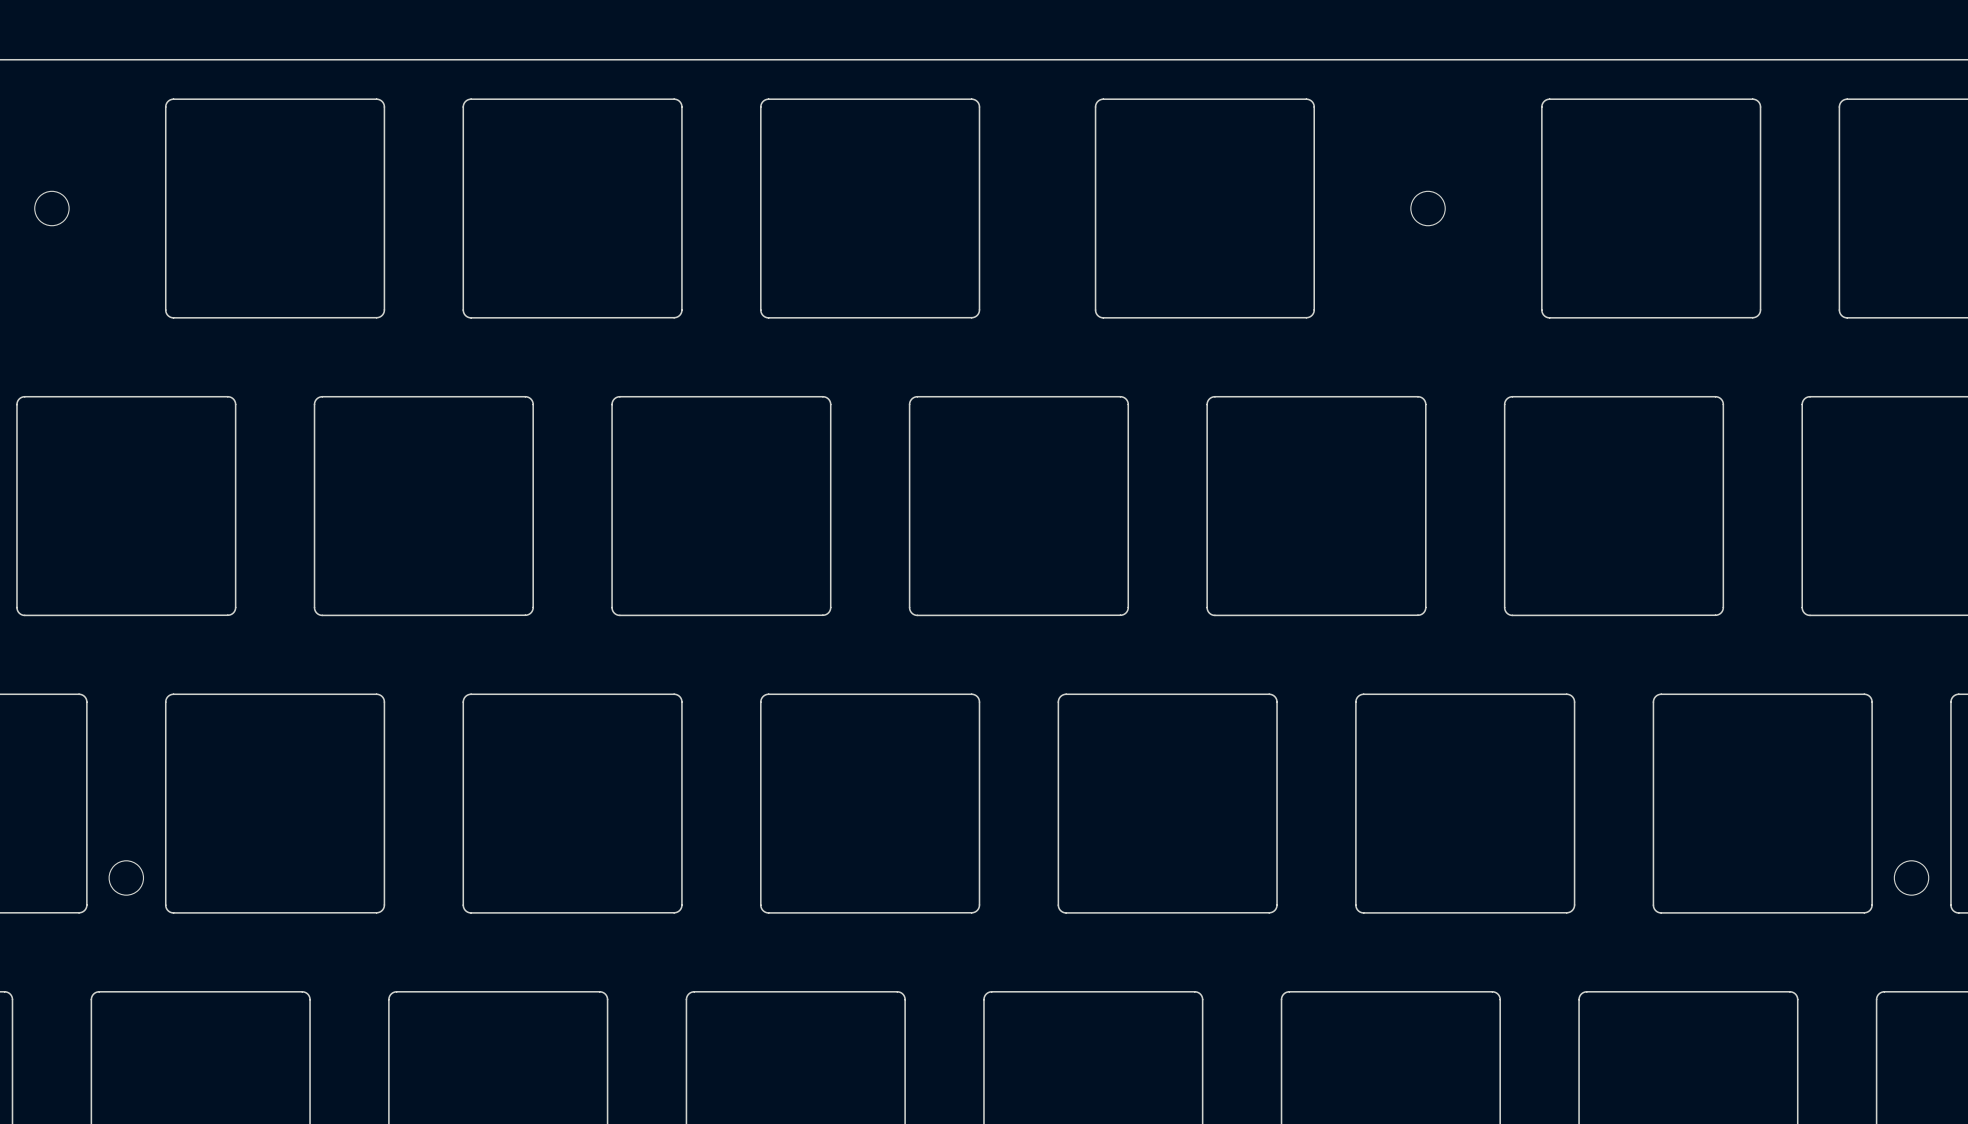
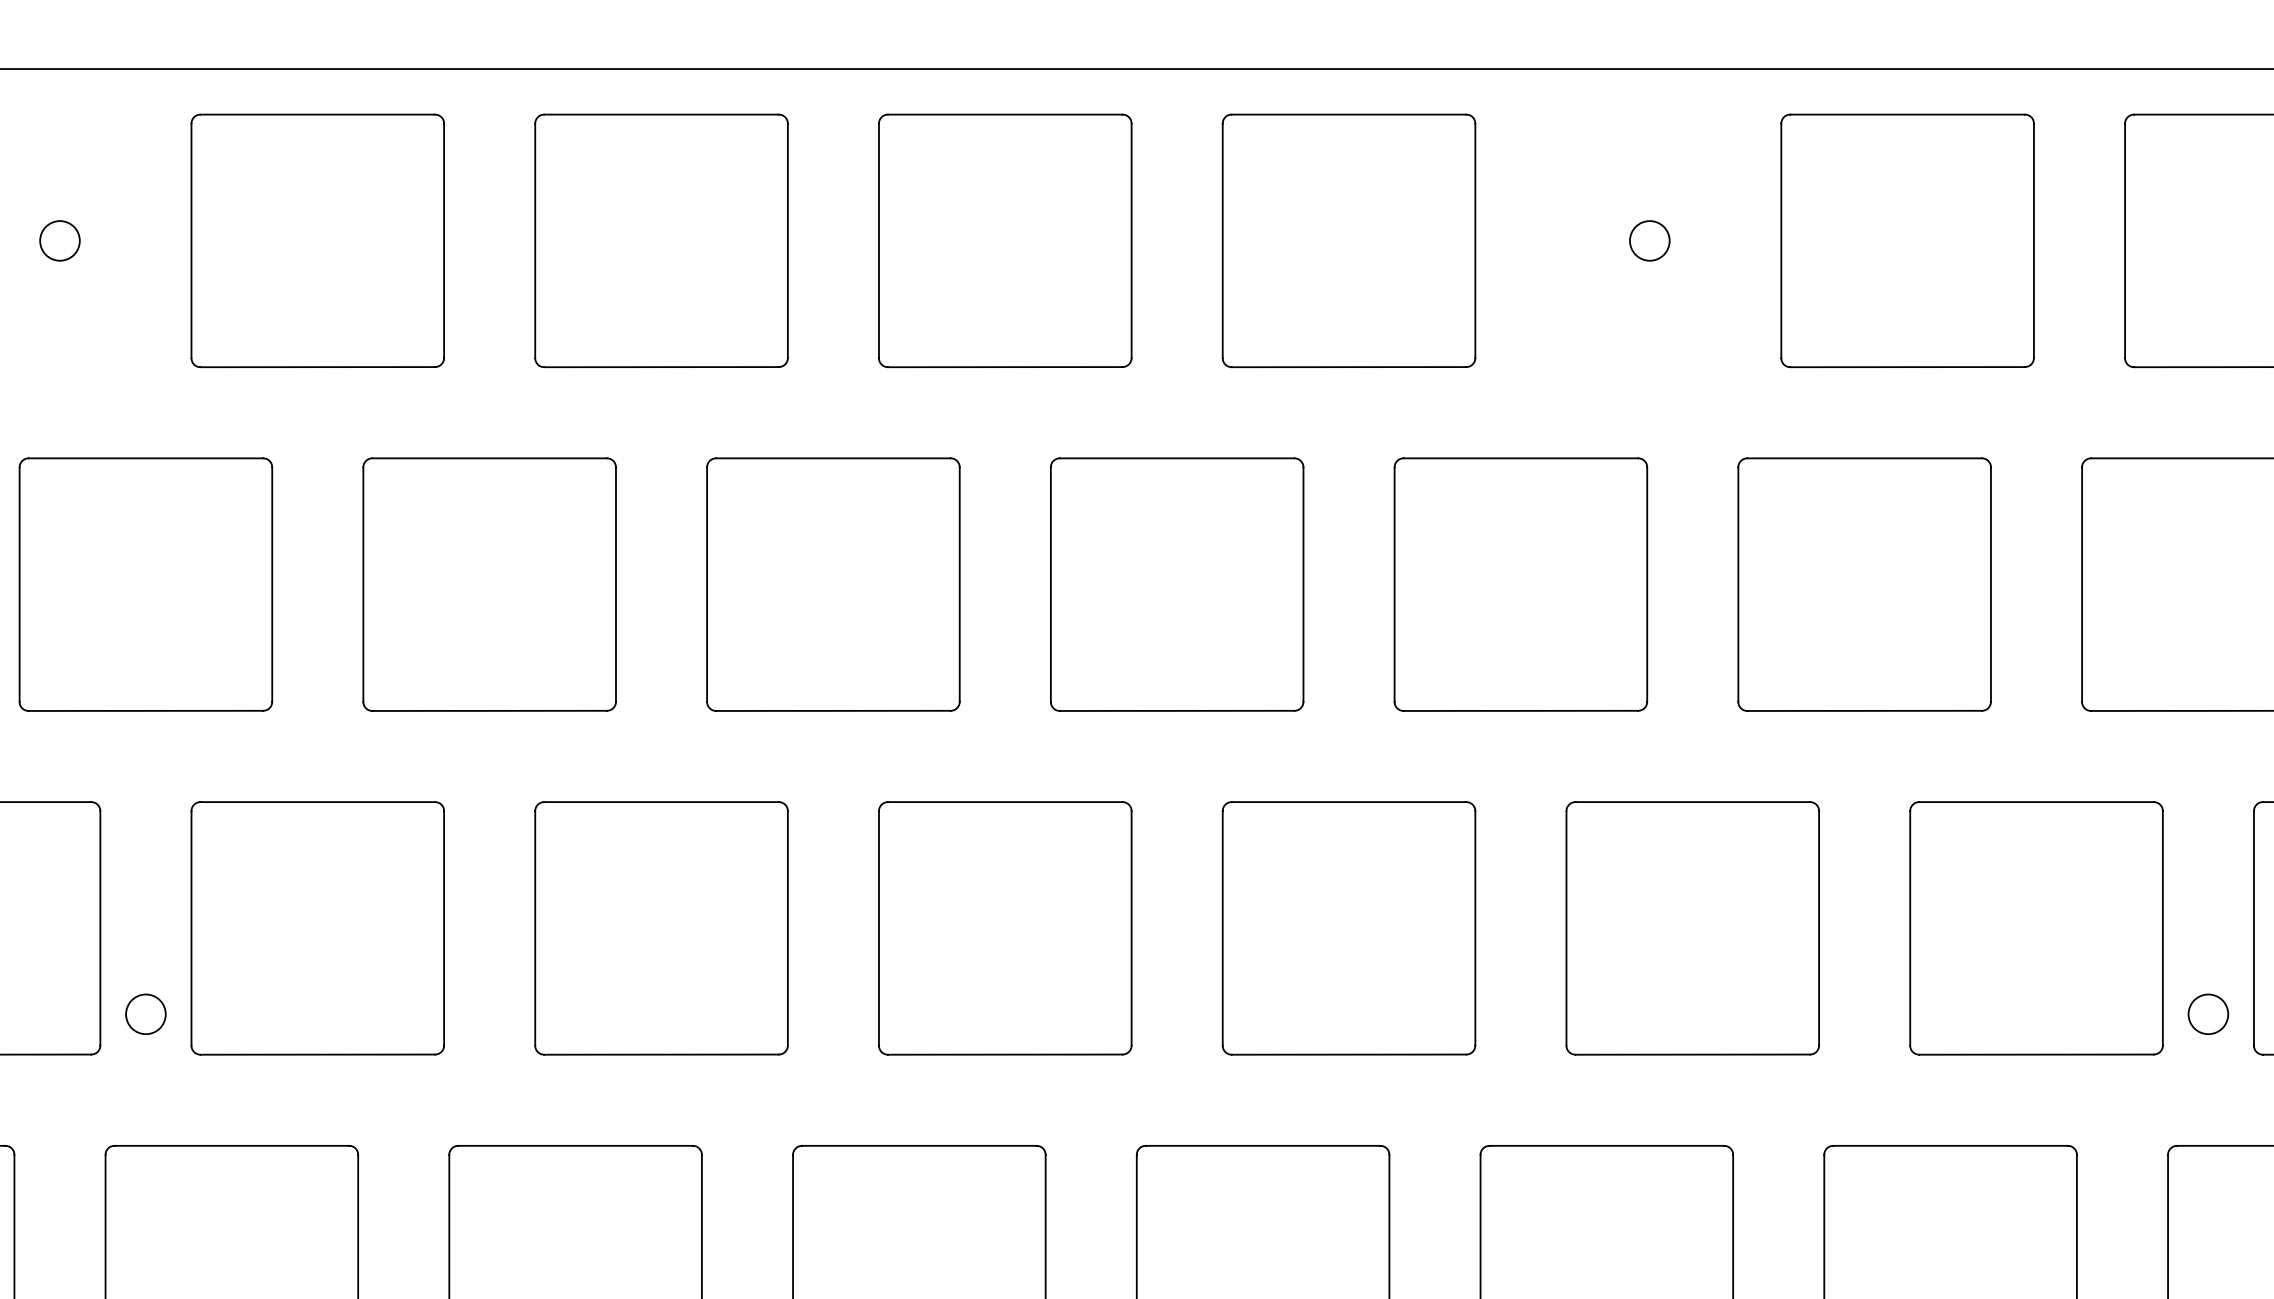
drawing position: (1204, 208) -> (1349, 240)

